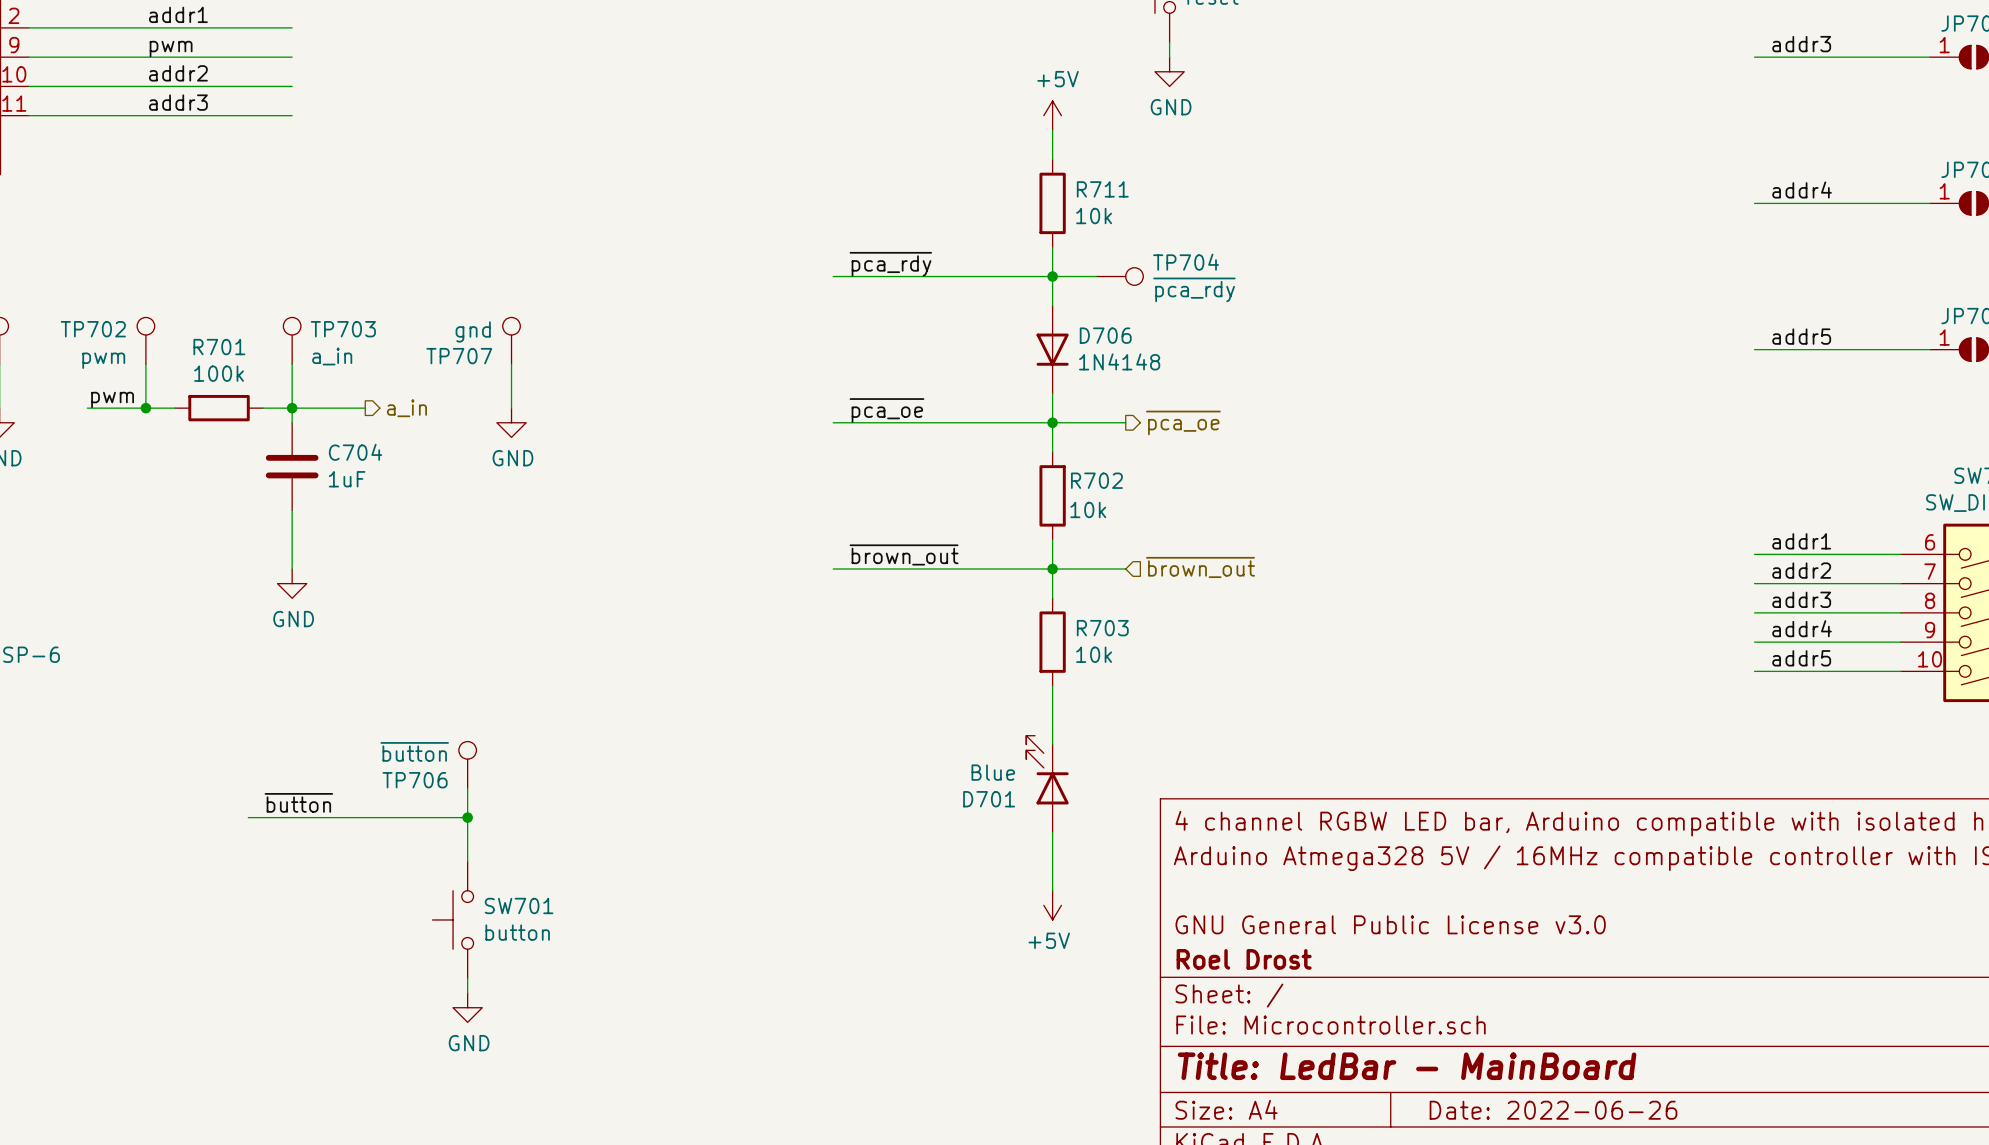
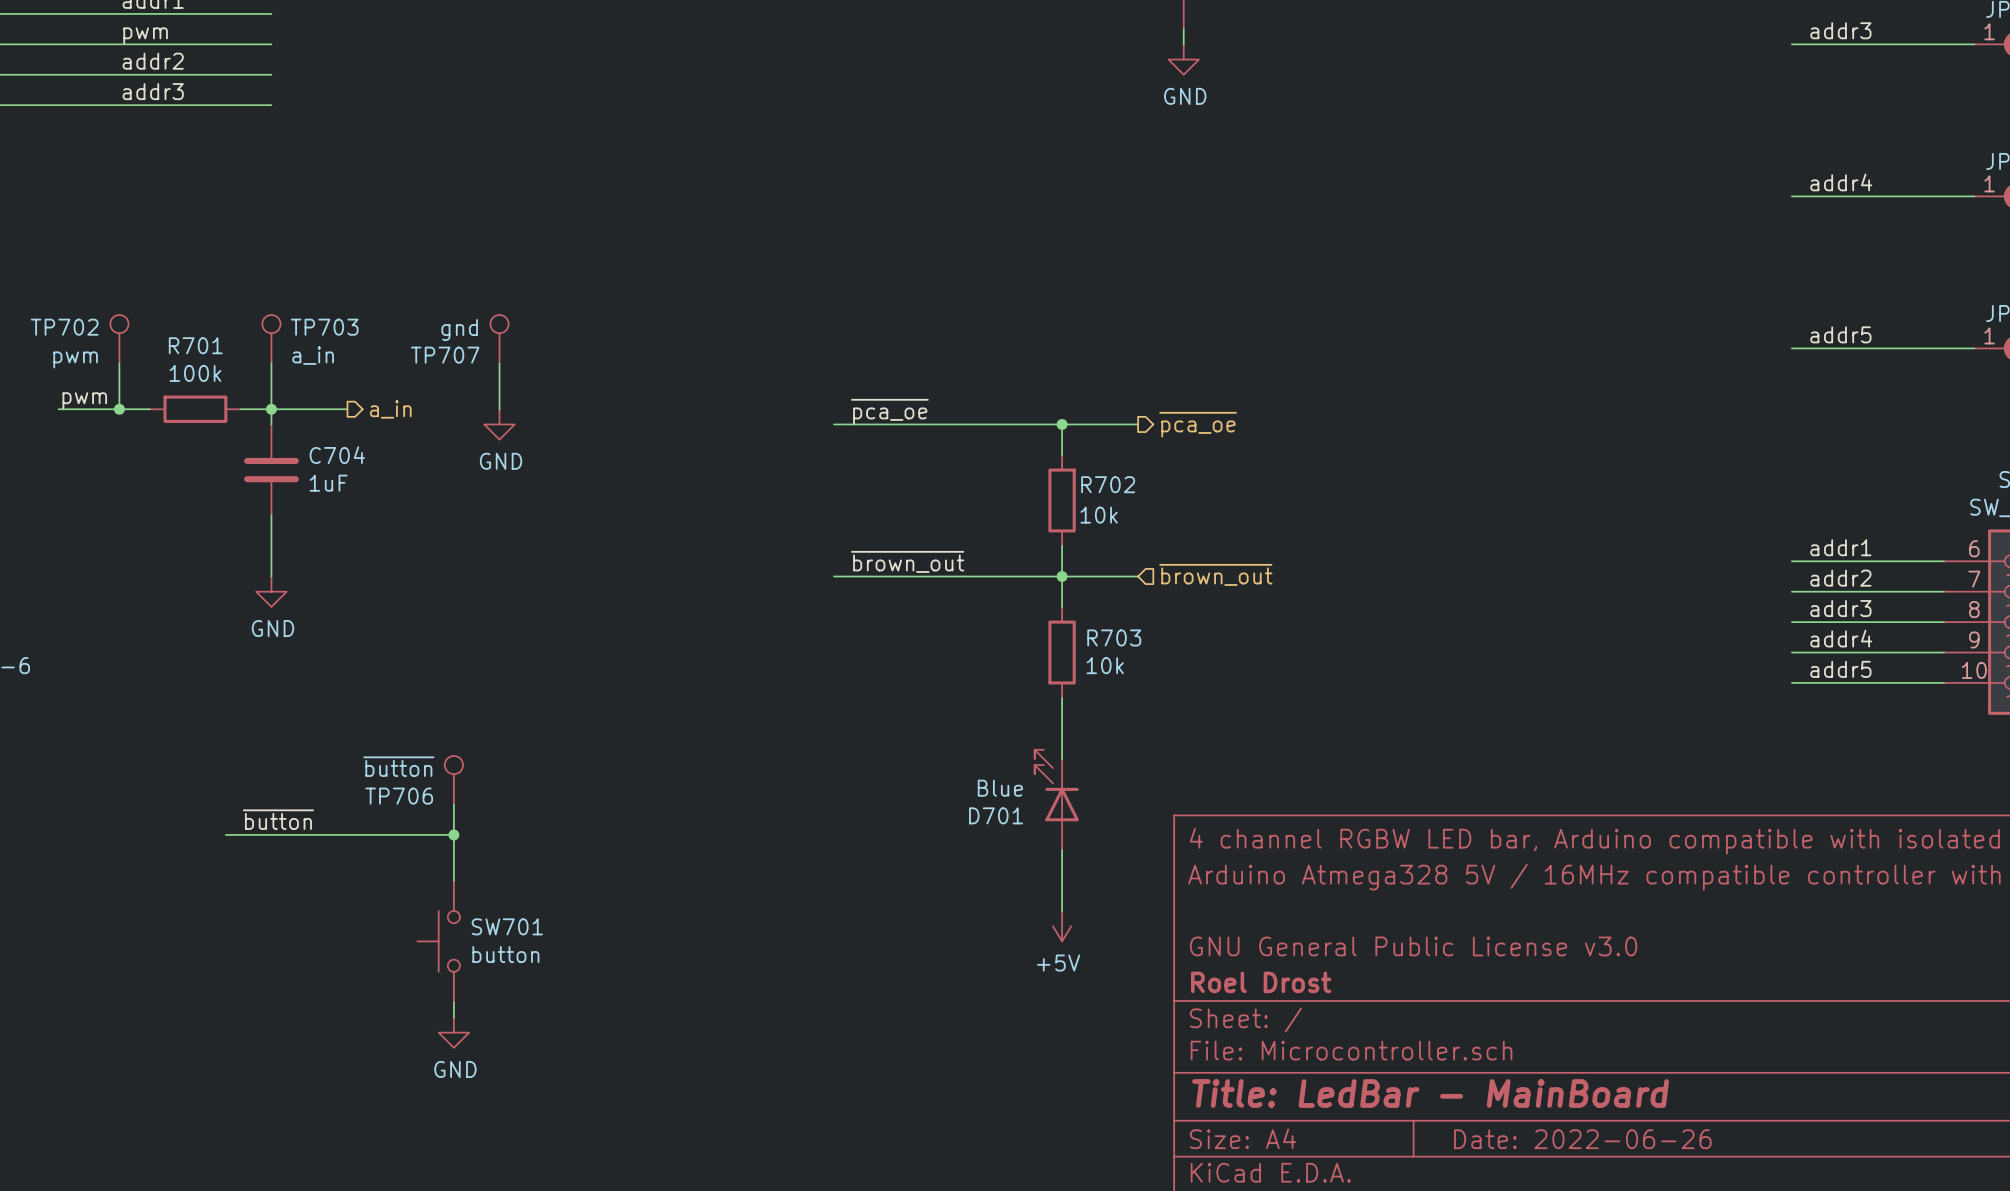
power symbol: +5V (1052, 115) -> none
wire: (1052, 130) (1052, 159) -> none
R711: 10k (1052, 203) -> none
wire: (1052, 247) (1052, 305) -> none
label: ~{pca_rdy} (890, 264) -> none
wire: (833, 276) (1096, 276) -> none
junction: (1052, 276) -> none
TP704: ~{pca_rdy} (1119, 276) -> none
D706: 1N4148 (1052, 349) -> none
wire: (1052, 393) (1052, 422) -> none

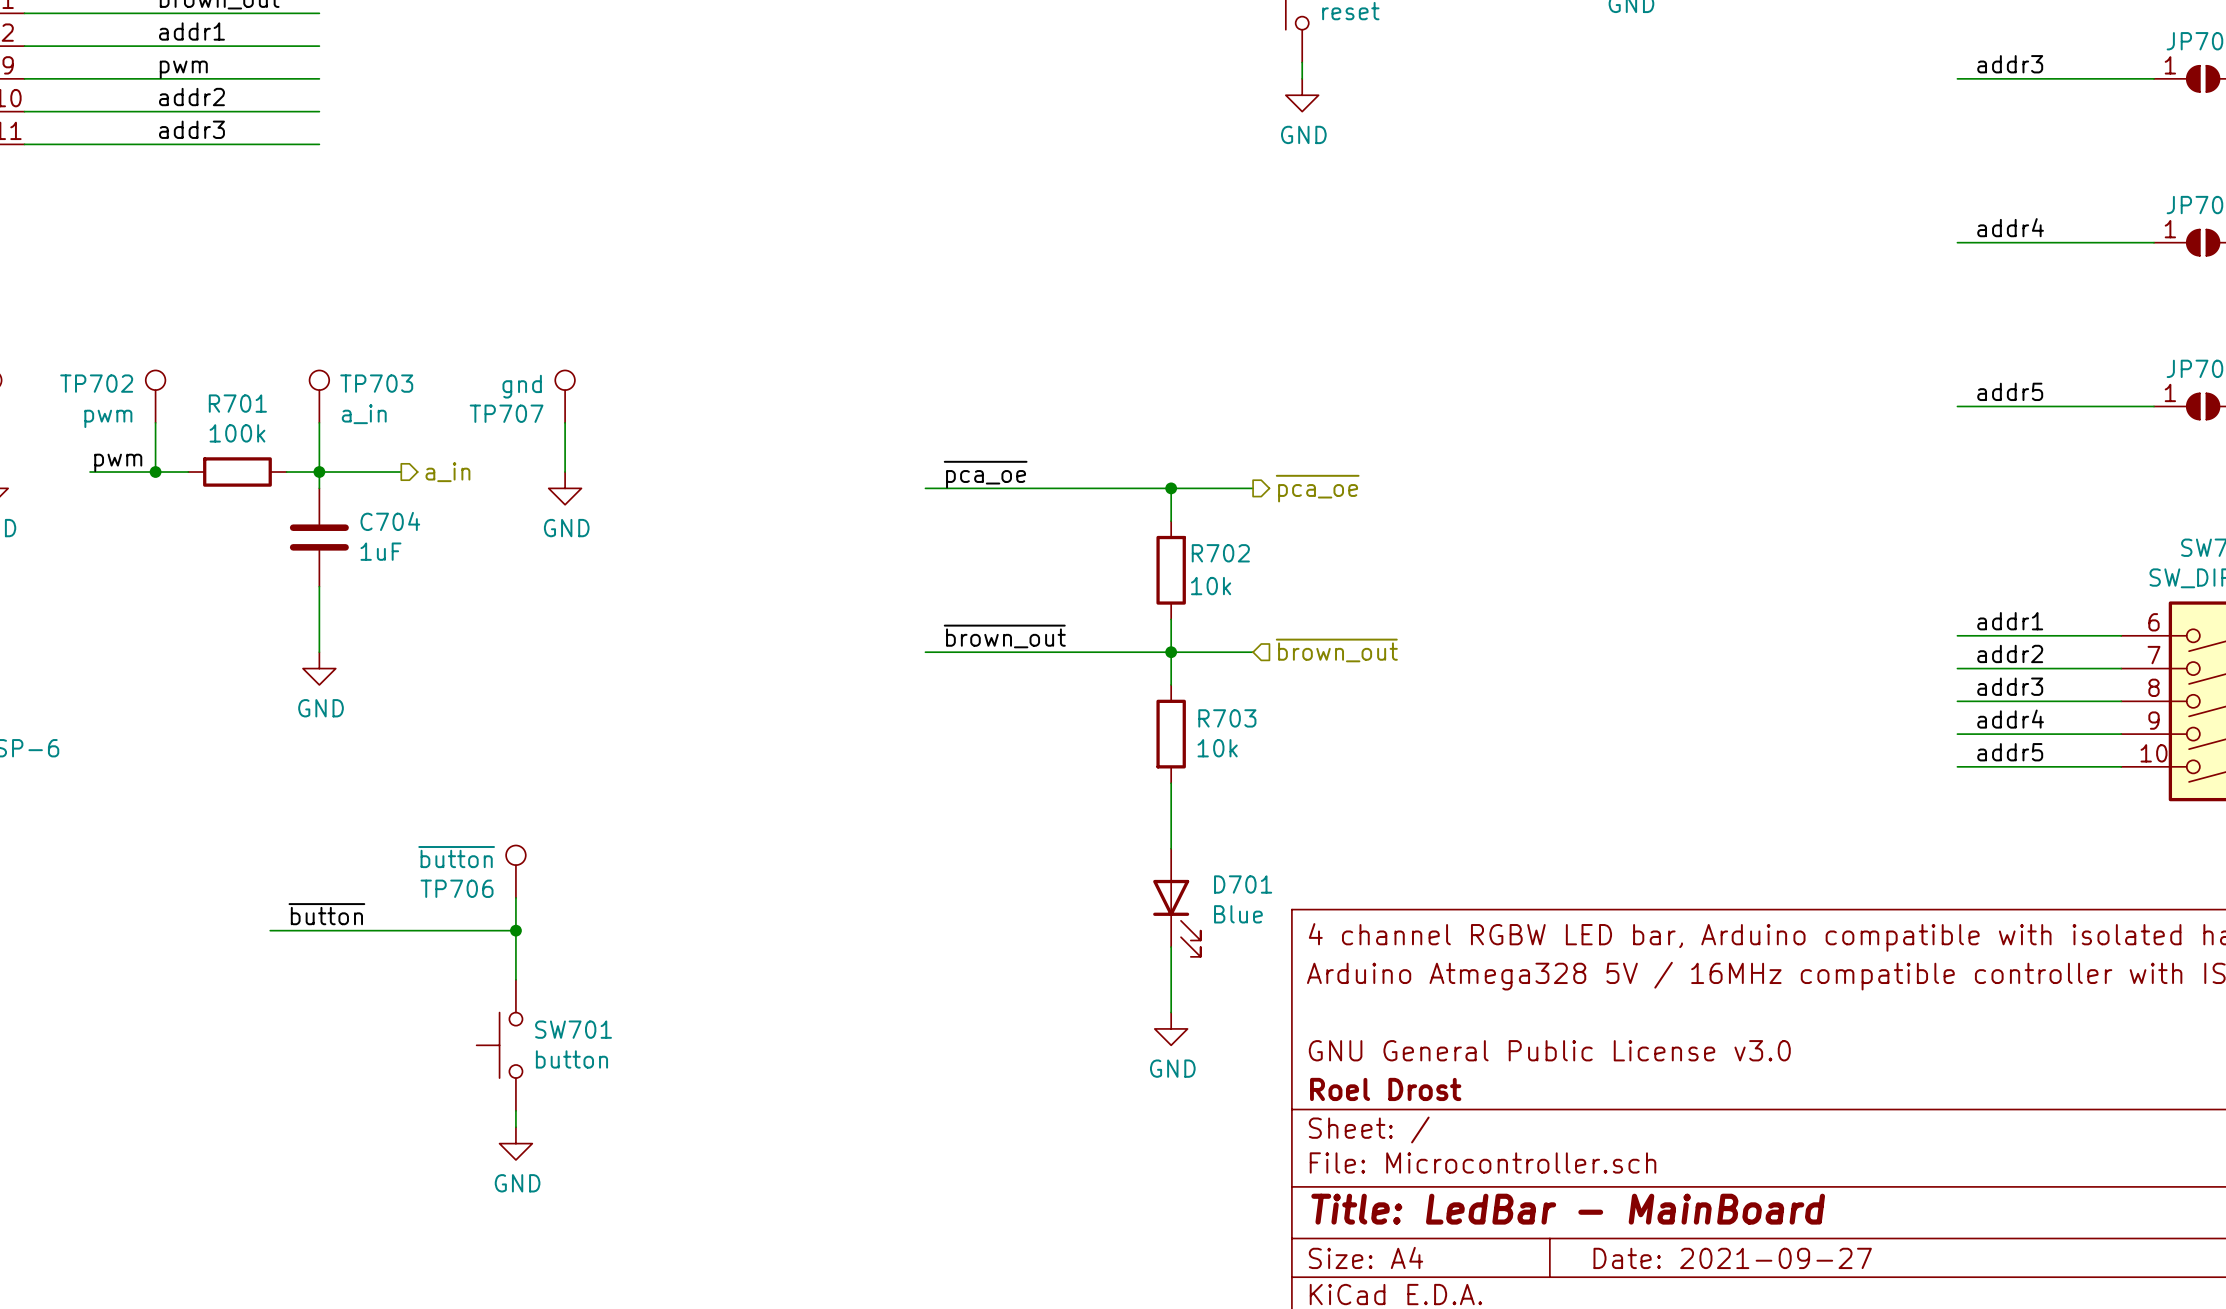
D701 rotation: 0° (1056, 785) -> 180° (1176, 918)
power symbol: +5V (1062, 926) -> GND (1171, 1028)
title block: Date: 2022-06-26 (1582, 1139) -> Date: 2021-09-27 (1732, 1258)

